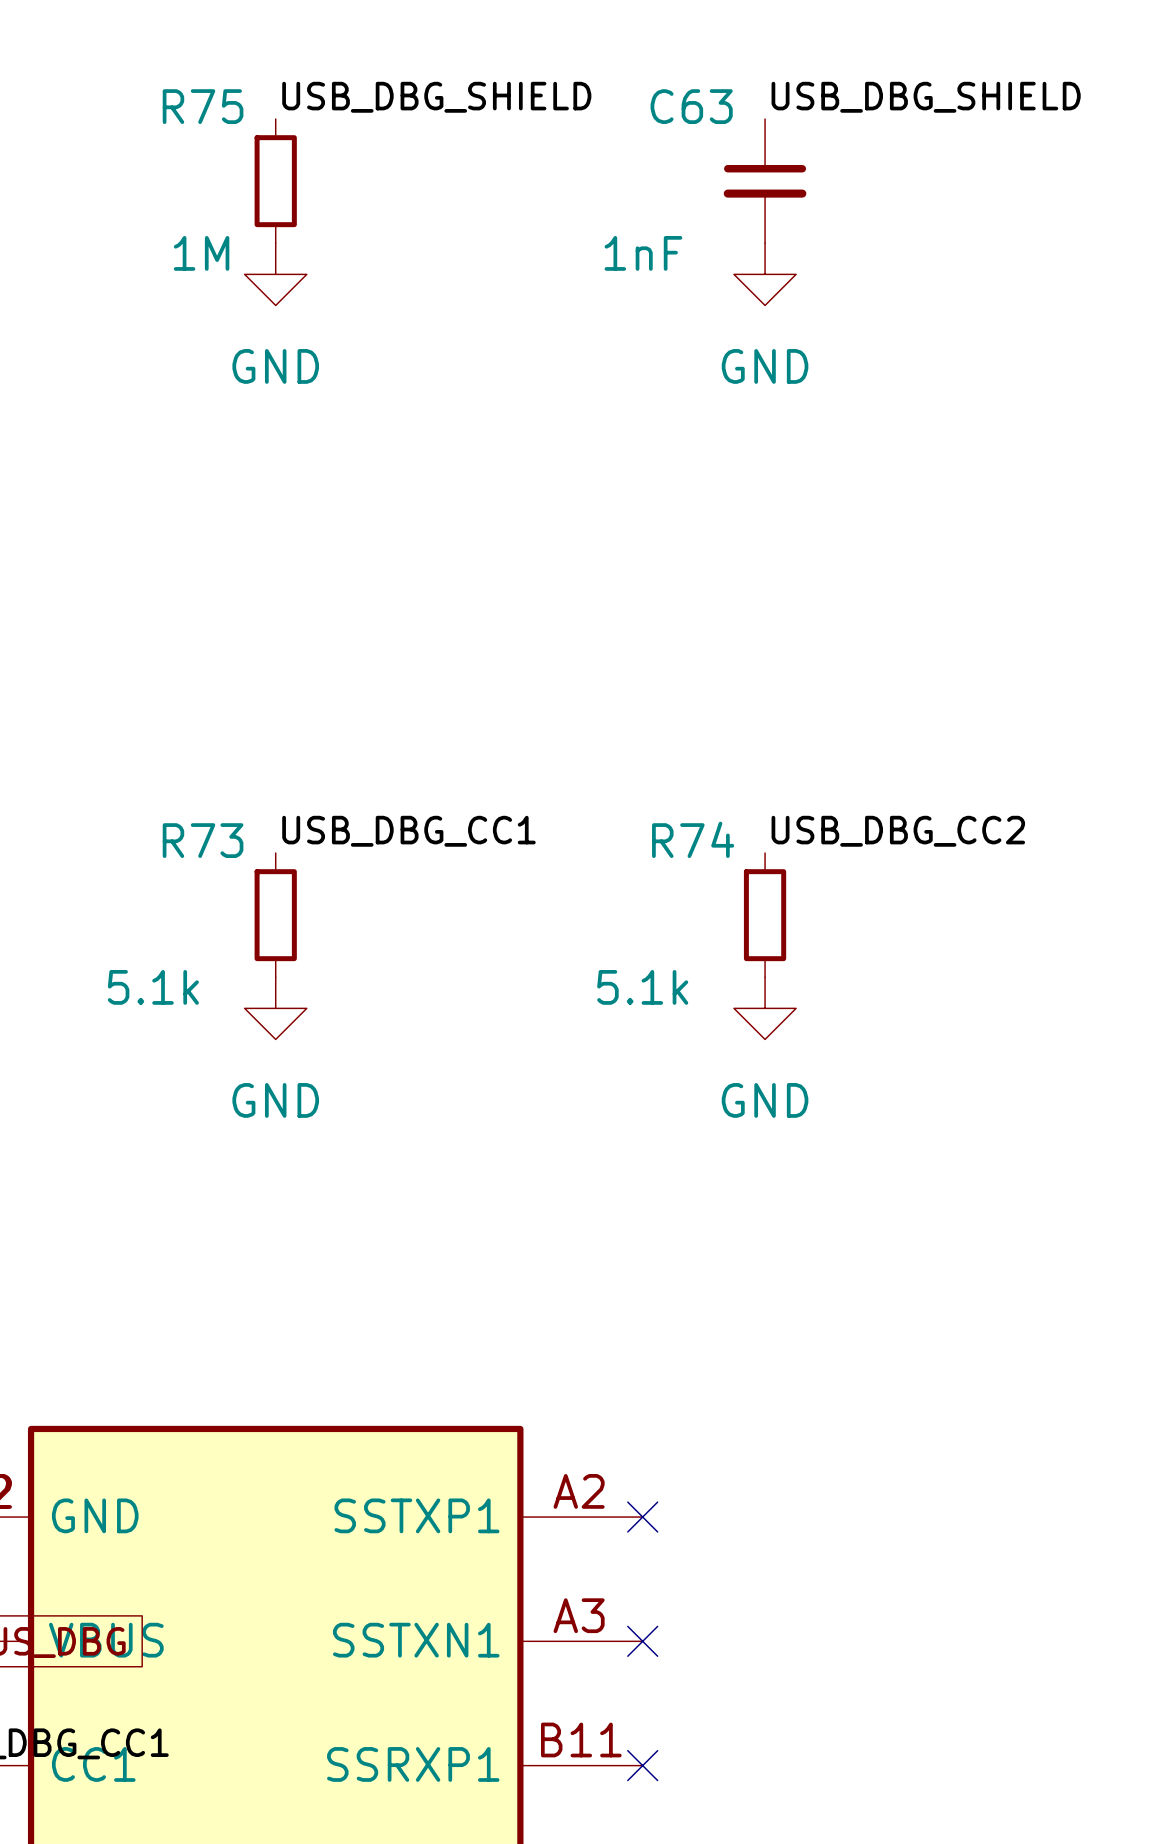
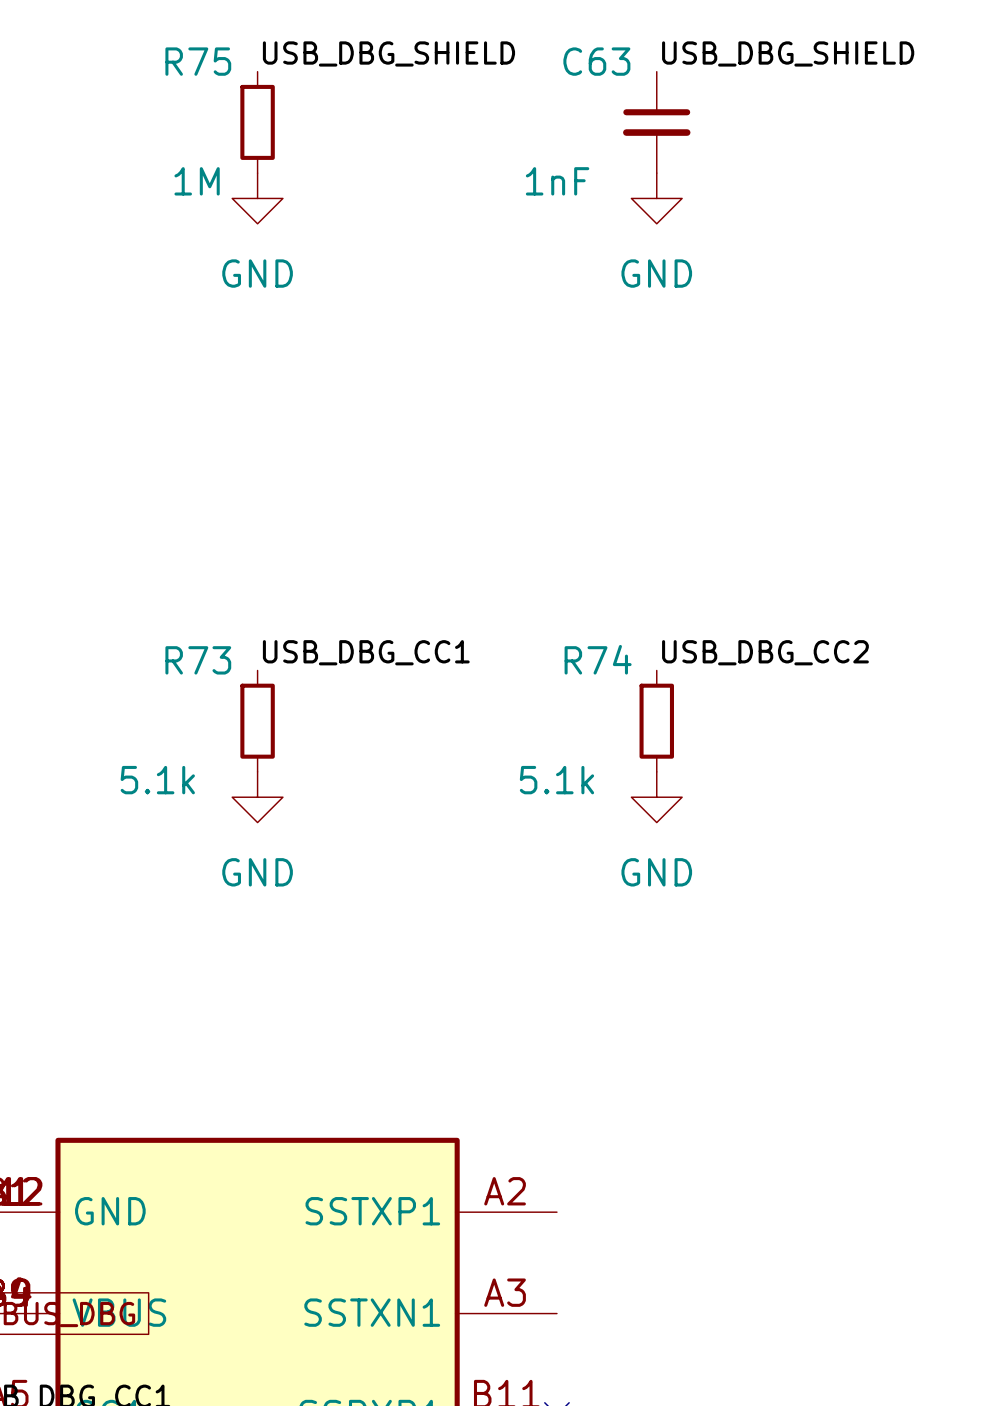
no-connect mark: (642, 1517) -> none
no-connect mark: (642, 1641) -> none

